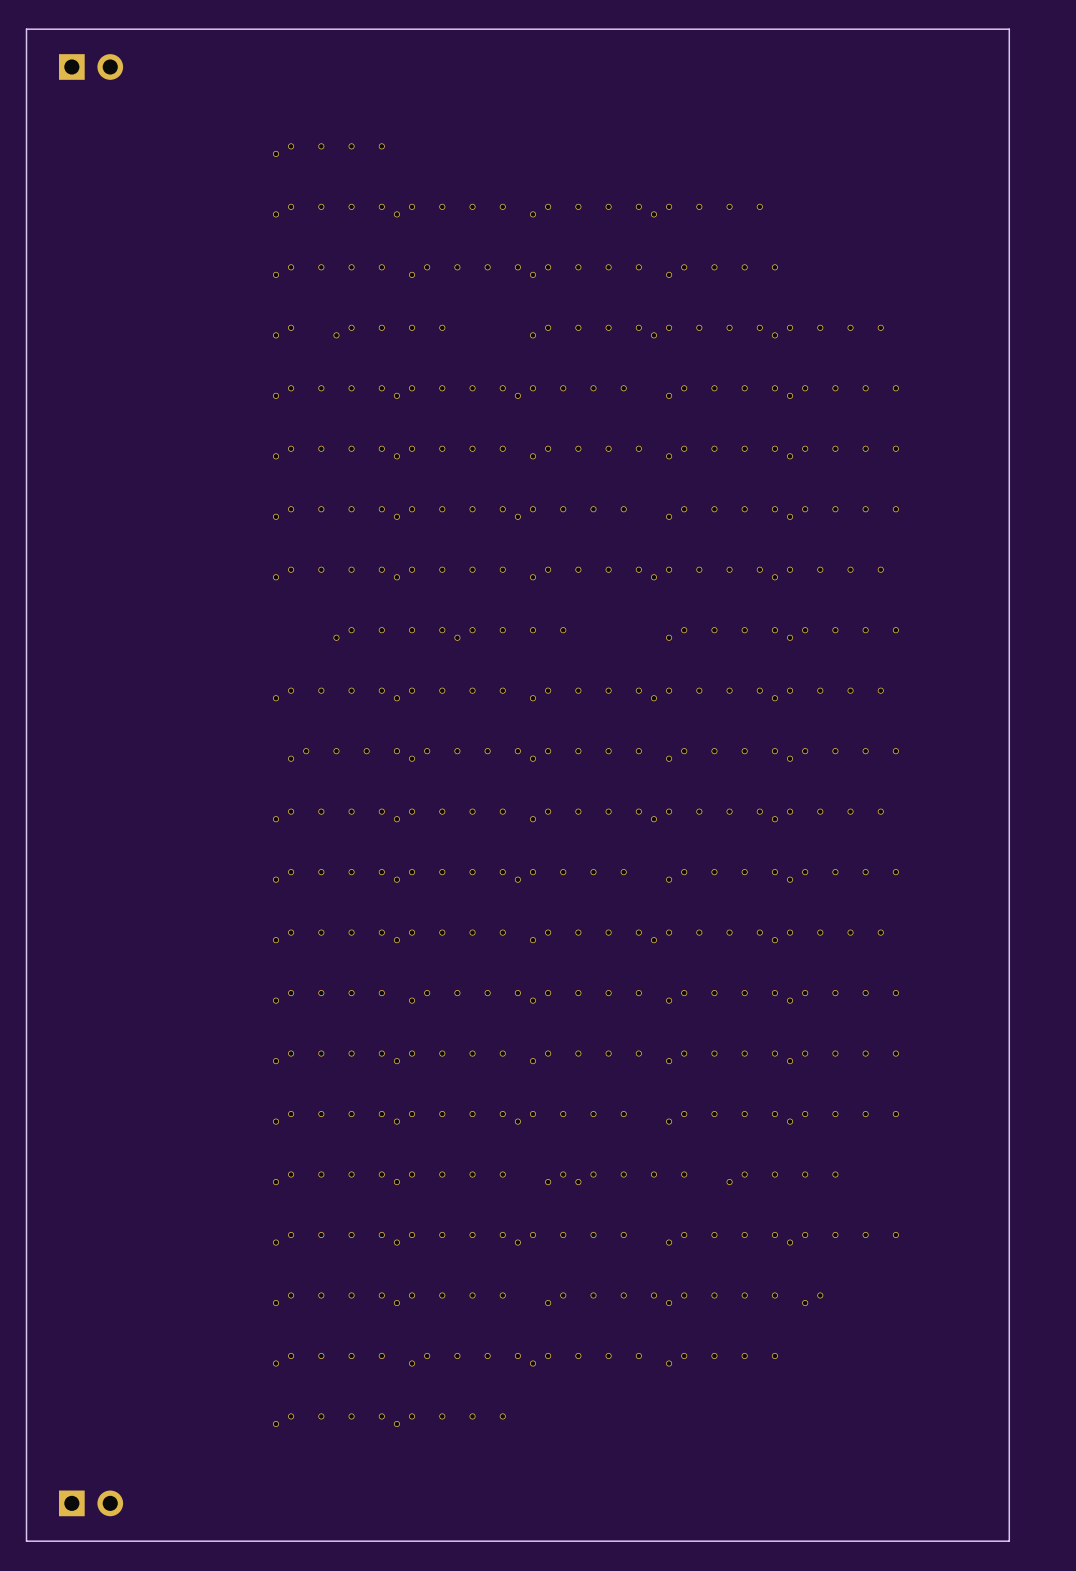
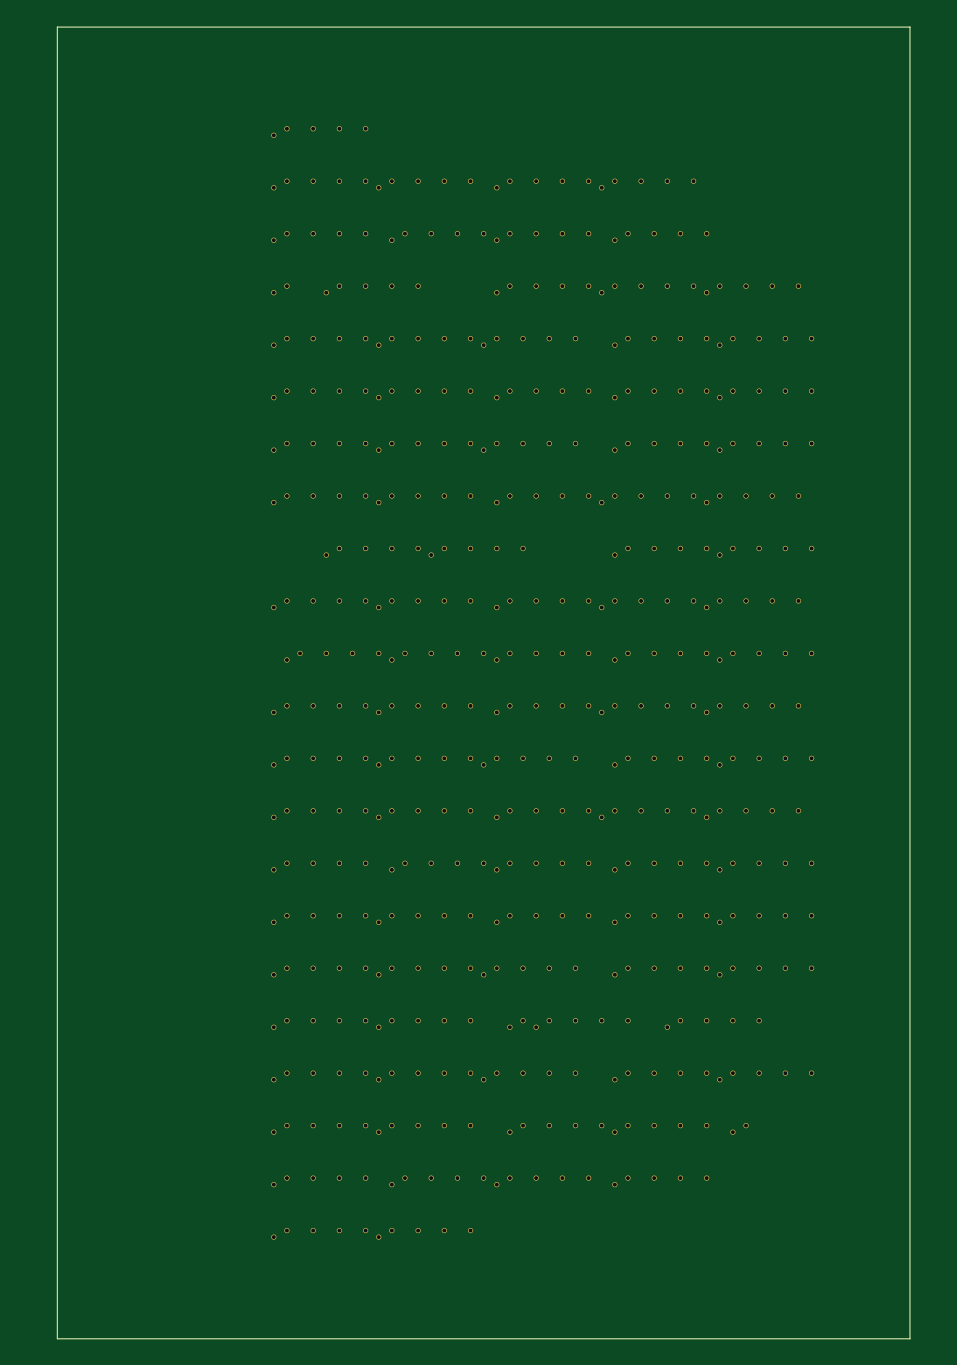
part: (91, 66) -> none
part: (91, 1503) -> none

